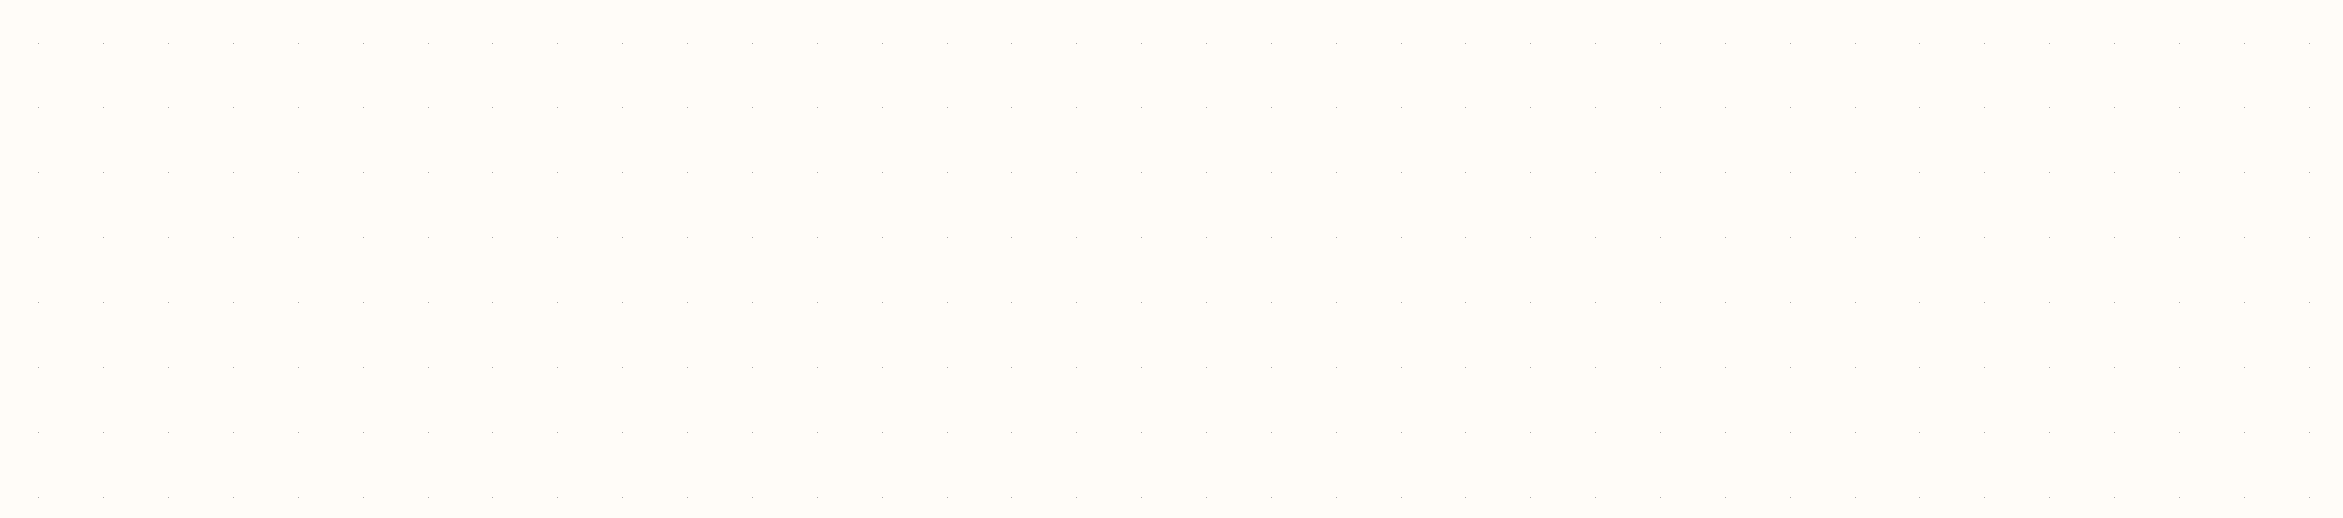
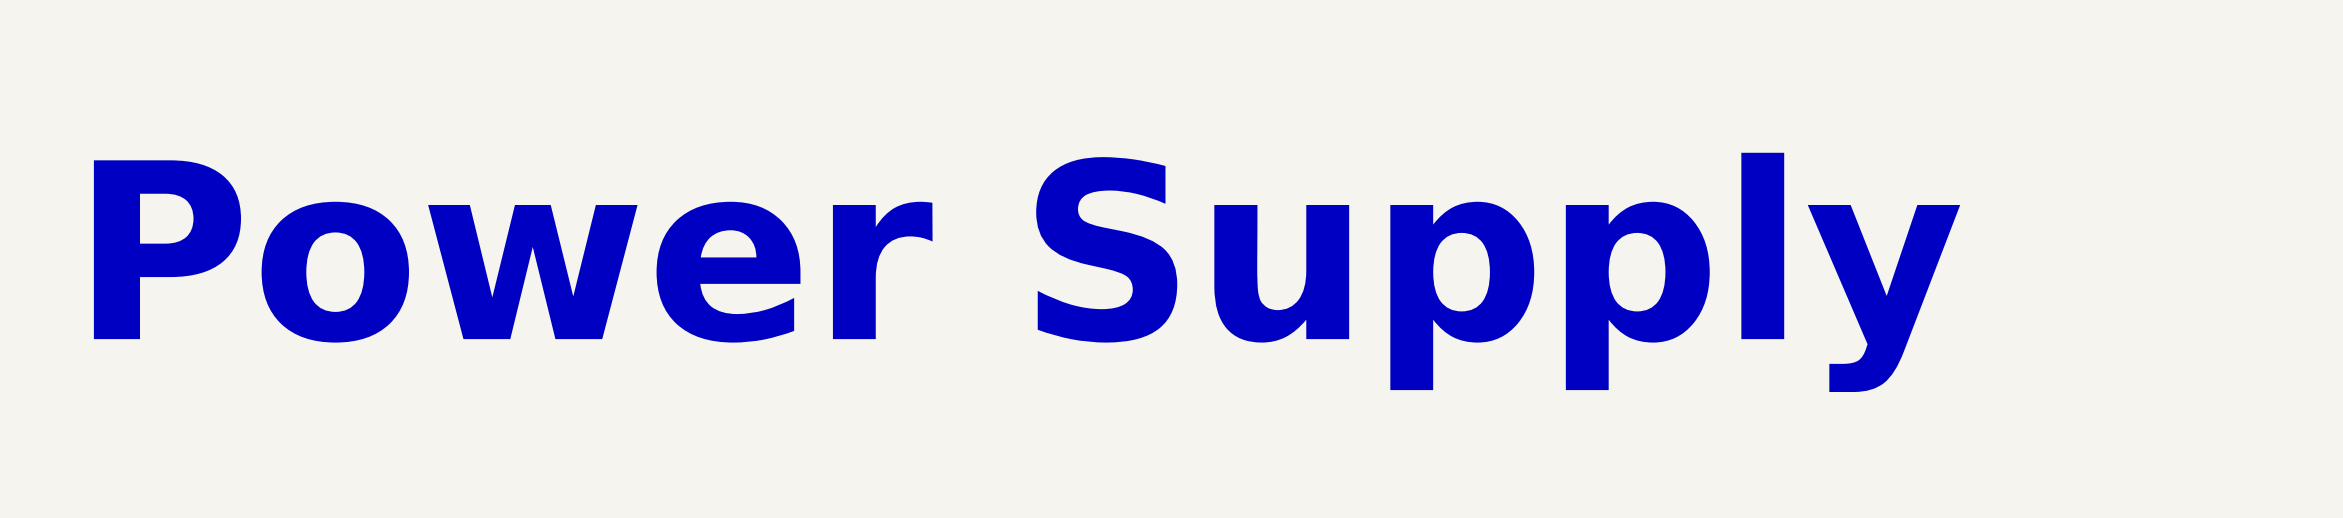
text: none -> Power Supply (1027, 272)

